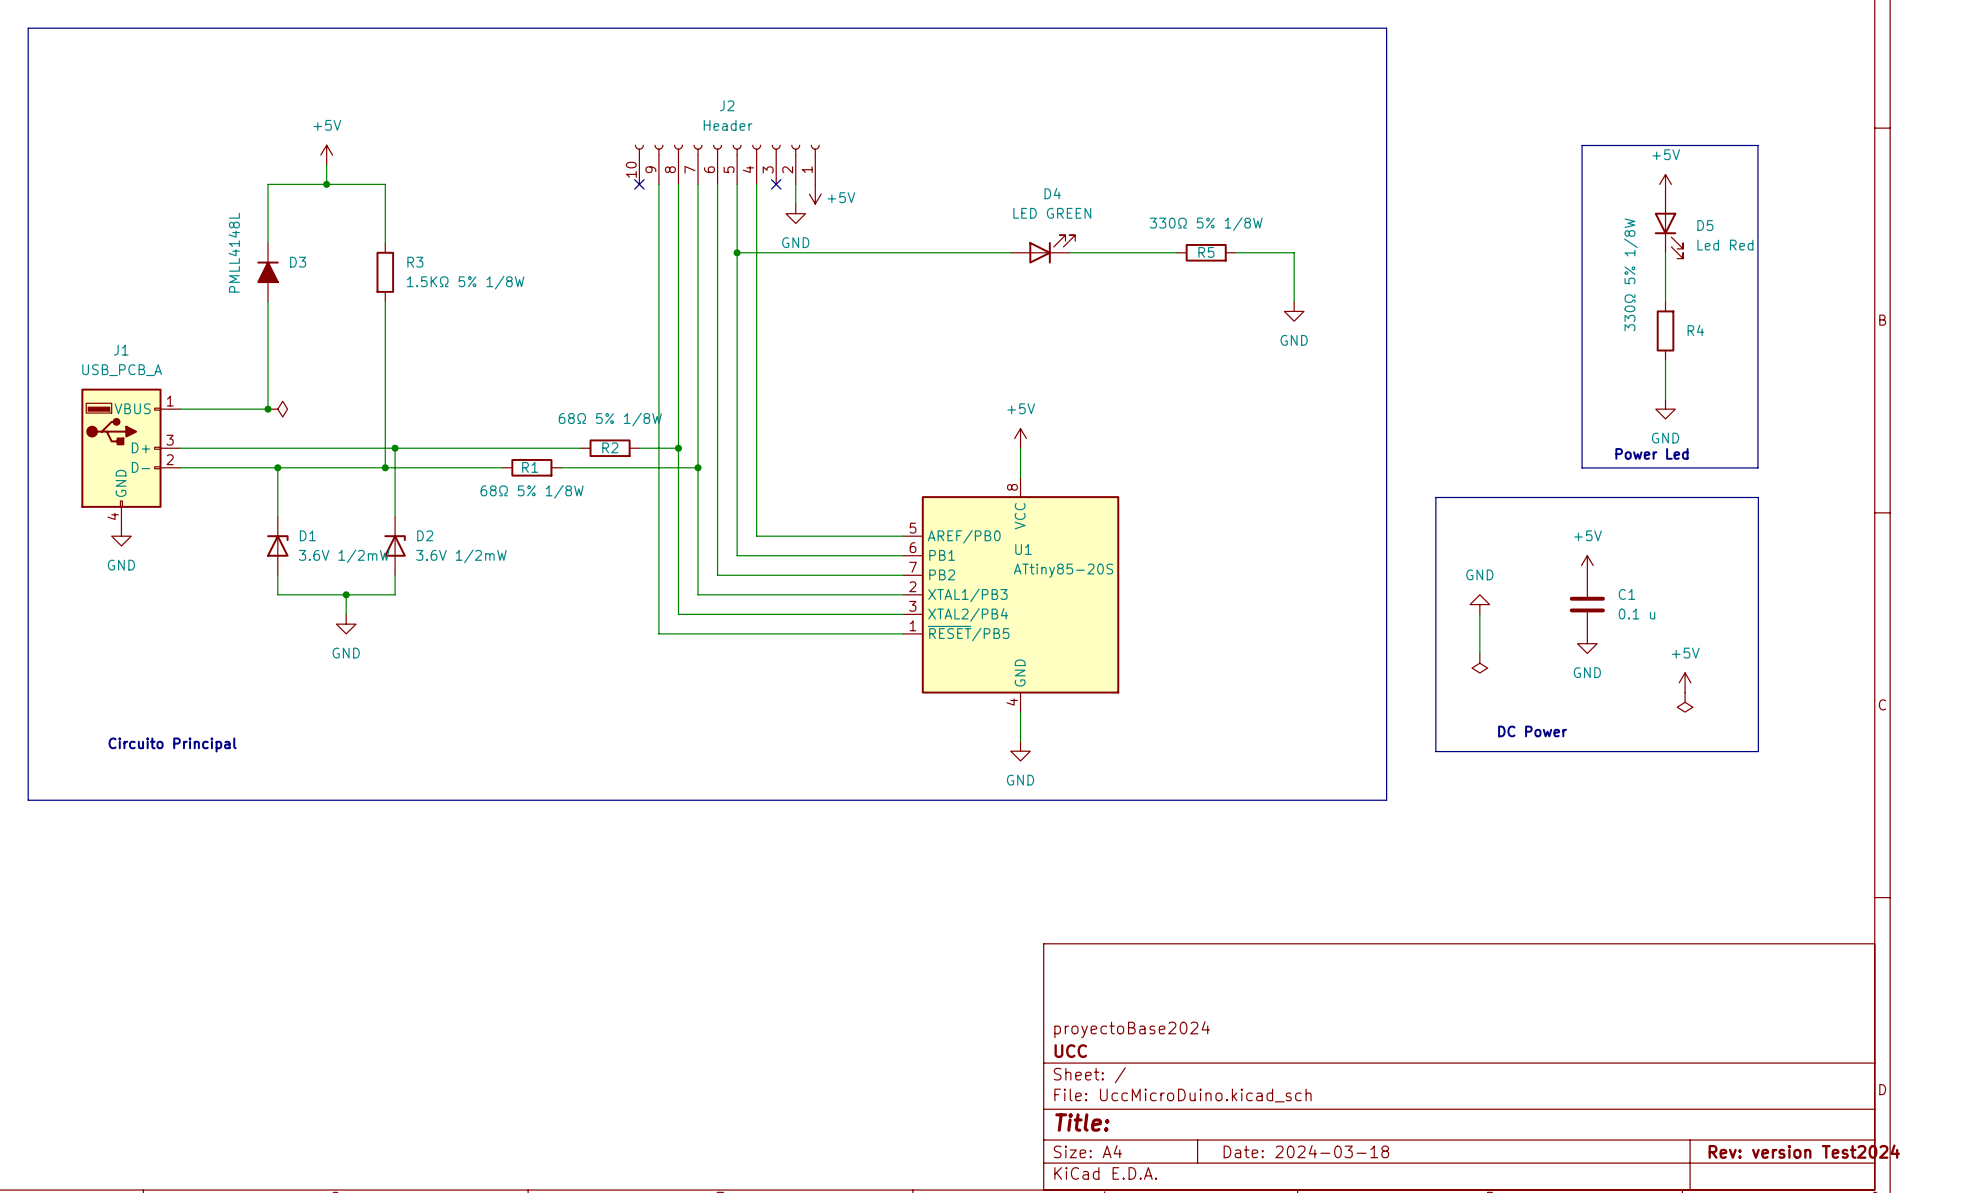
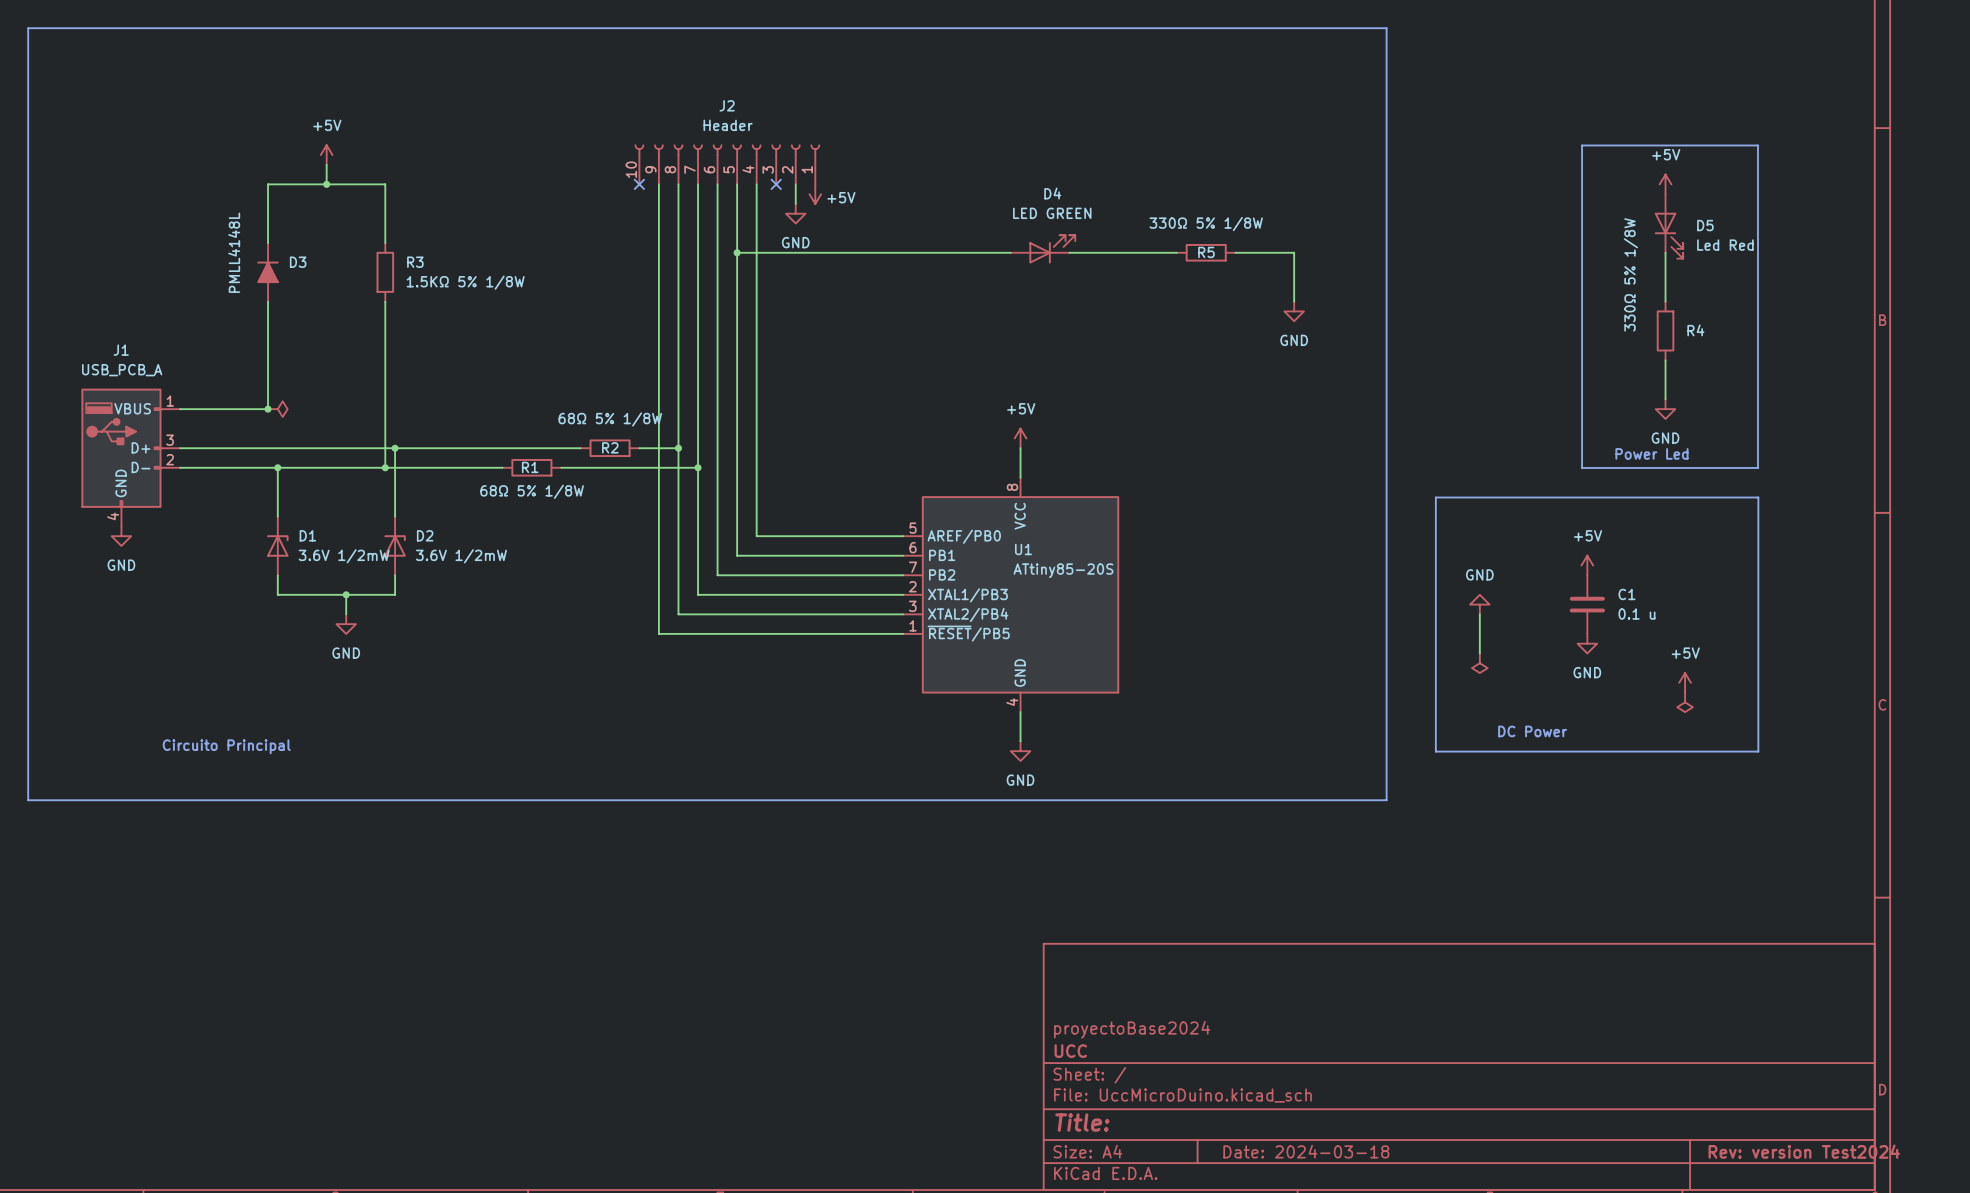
text position: Circuito Principal (172, 745) -> Circuito Principal (226, 746)

